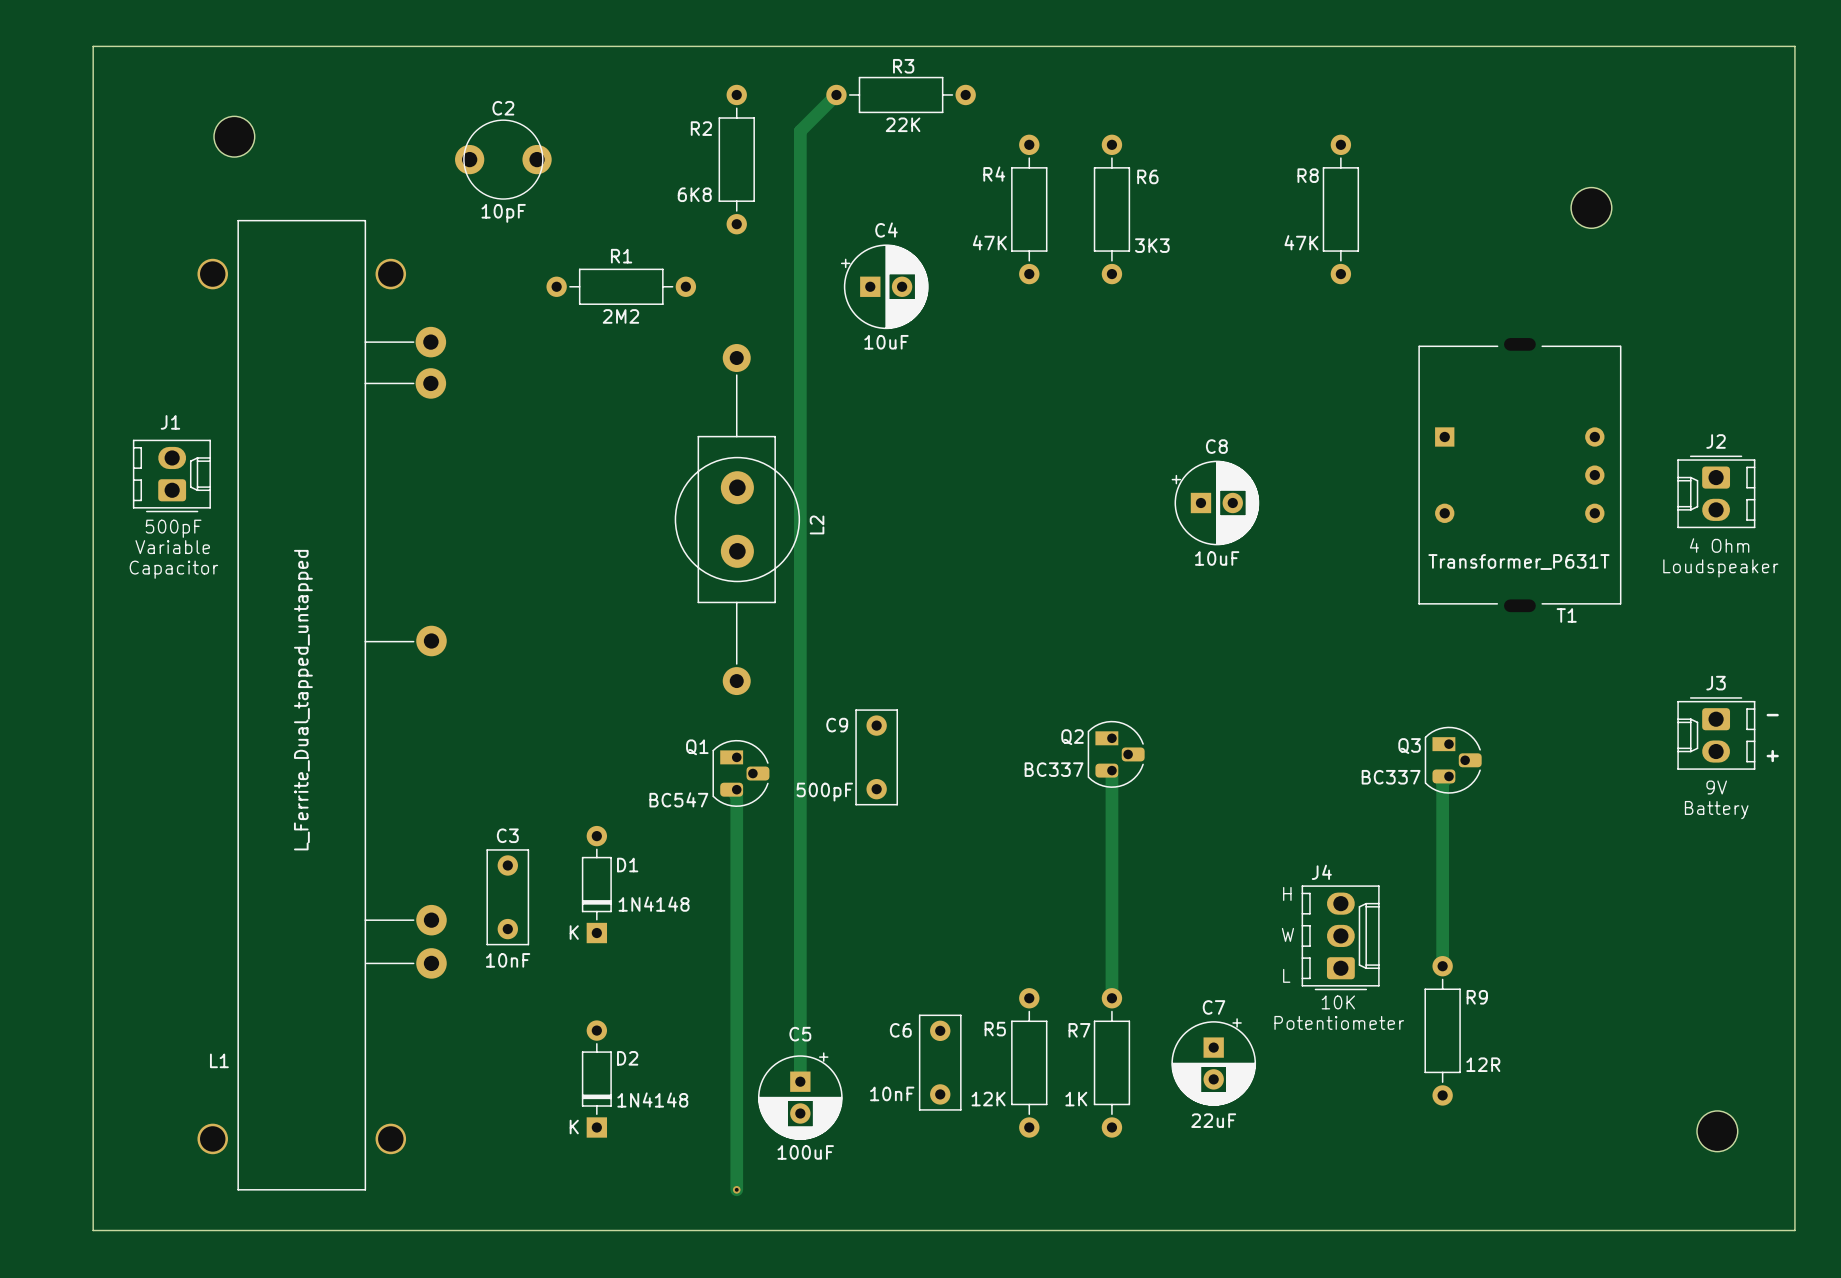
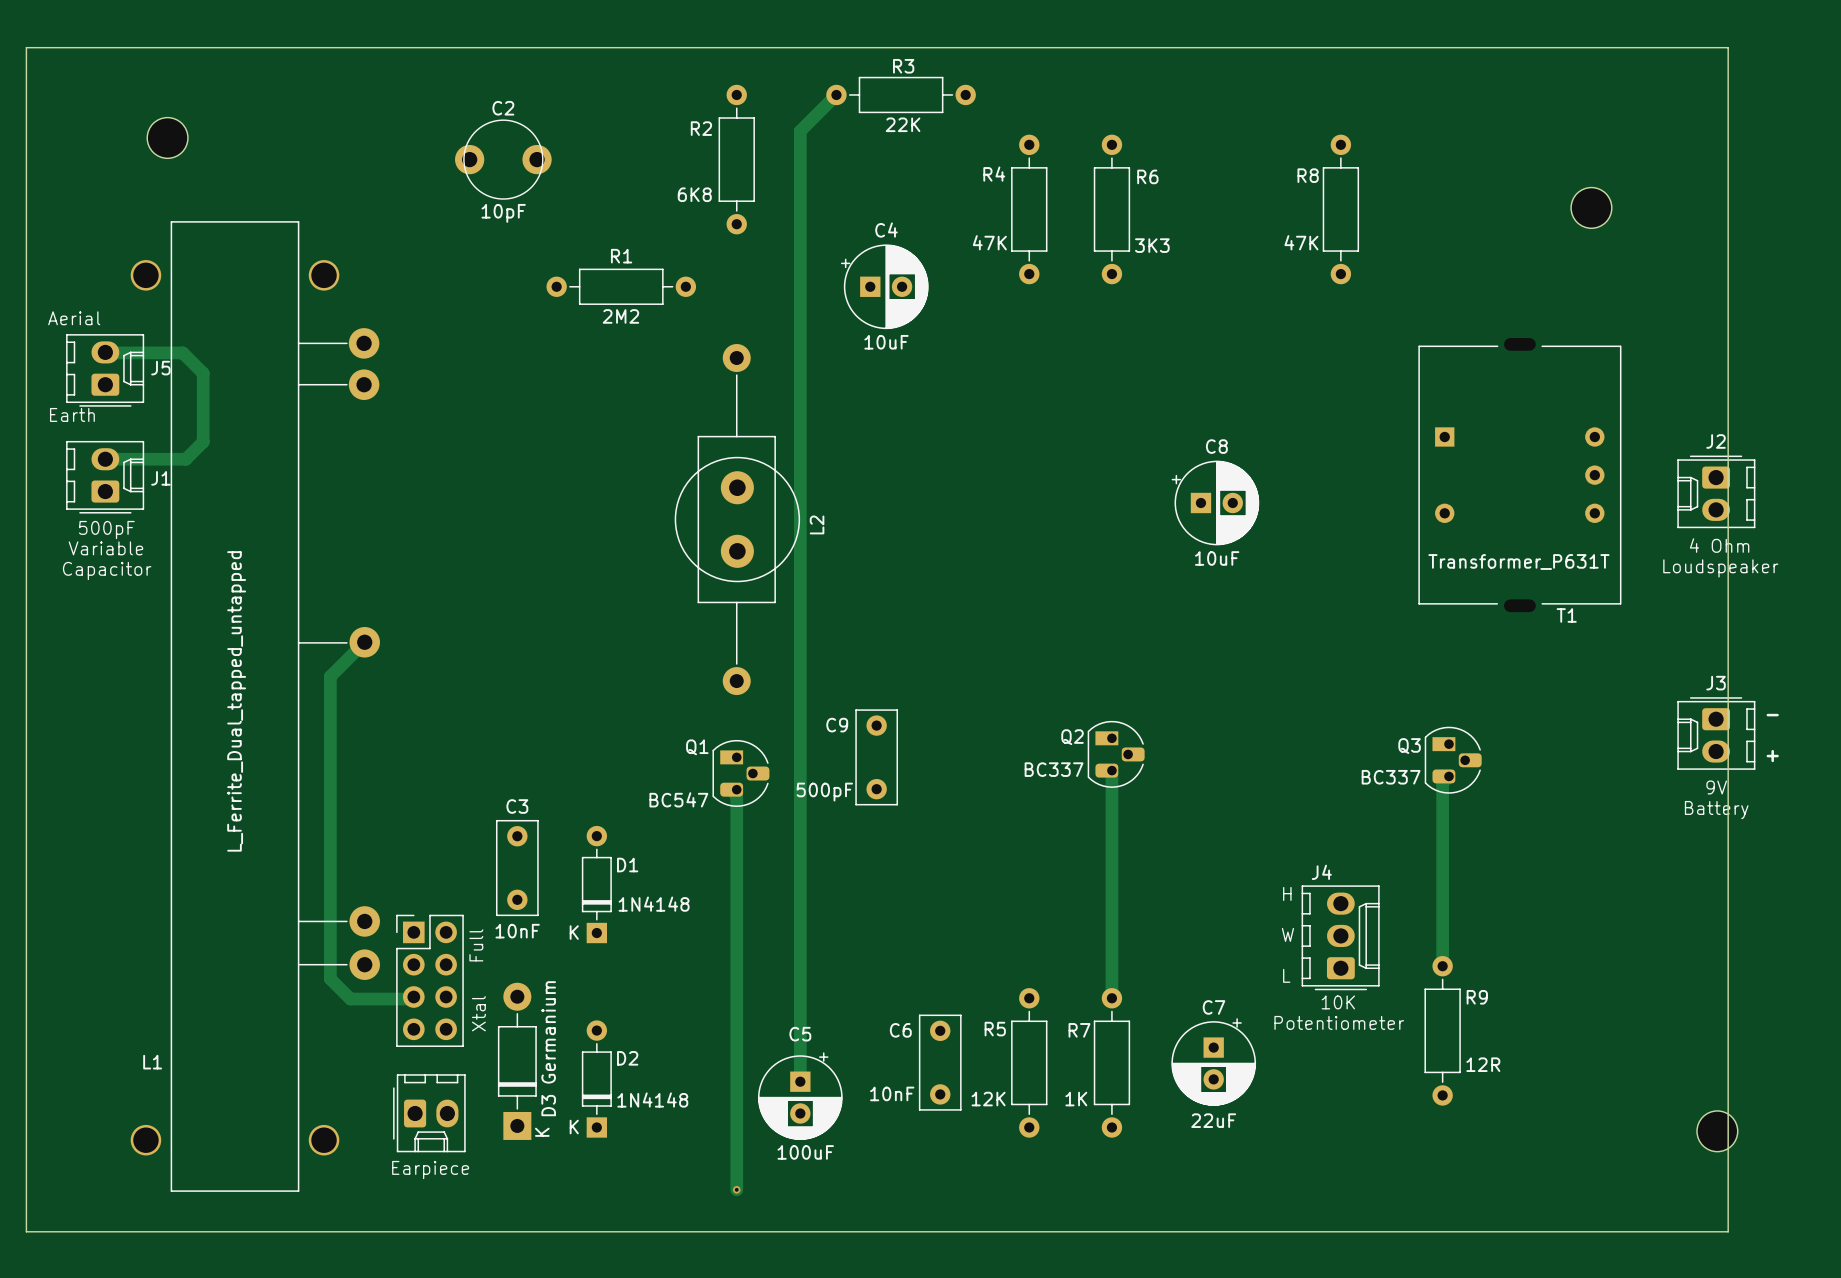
board edge: (93, 46) (1794, 46) (1794, 1230) (93, 1230) (93, 46) -> (26, 47) (1728, 47) (1728, 1231) (26, 1231) (26, 47)
part position: (234, 136) -> (167, 137)
text: none -> Aerial (74, 318)
track: none -> (105, 352) (182, 352) (203, 373) (203, 441) (185, 459) (105, 459)
J5: none -> (105, 370)
text: none -> Earth (72, 414)
J1 name position: J1 (170, 422) -> J1 (160, 478)
J1 position: (171, 475) -> (105, 477)
text position: 500pF (173, 528) -> 500pF (106, 530)
text position: Variable (172, 547) -> Variable (105, 548)
text position: Capacitor (173, 569) -> Capacitor (107, 570)
track: none -> (364, 642) (330, 676) (330, 978) (350, 999) (411, 999) (413, 996)
L1 position: (322, 705) -> (255, 706)
C3 position: (507, 897) -> (517, 868)
text: none -> Full (476, 945)
part: none -> (429, 980)
text: none -> Xtal (478, 1013)
D3: none -> Germanium (517, 1061)
part: none -> (429, 1113)
text: none -> Earpiece (430, 1170)

